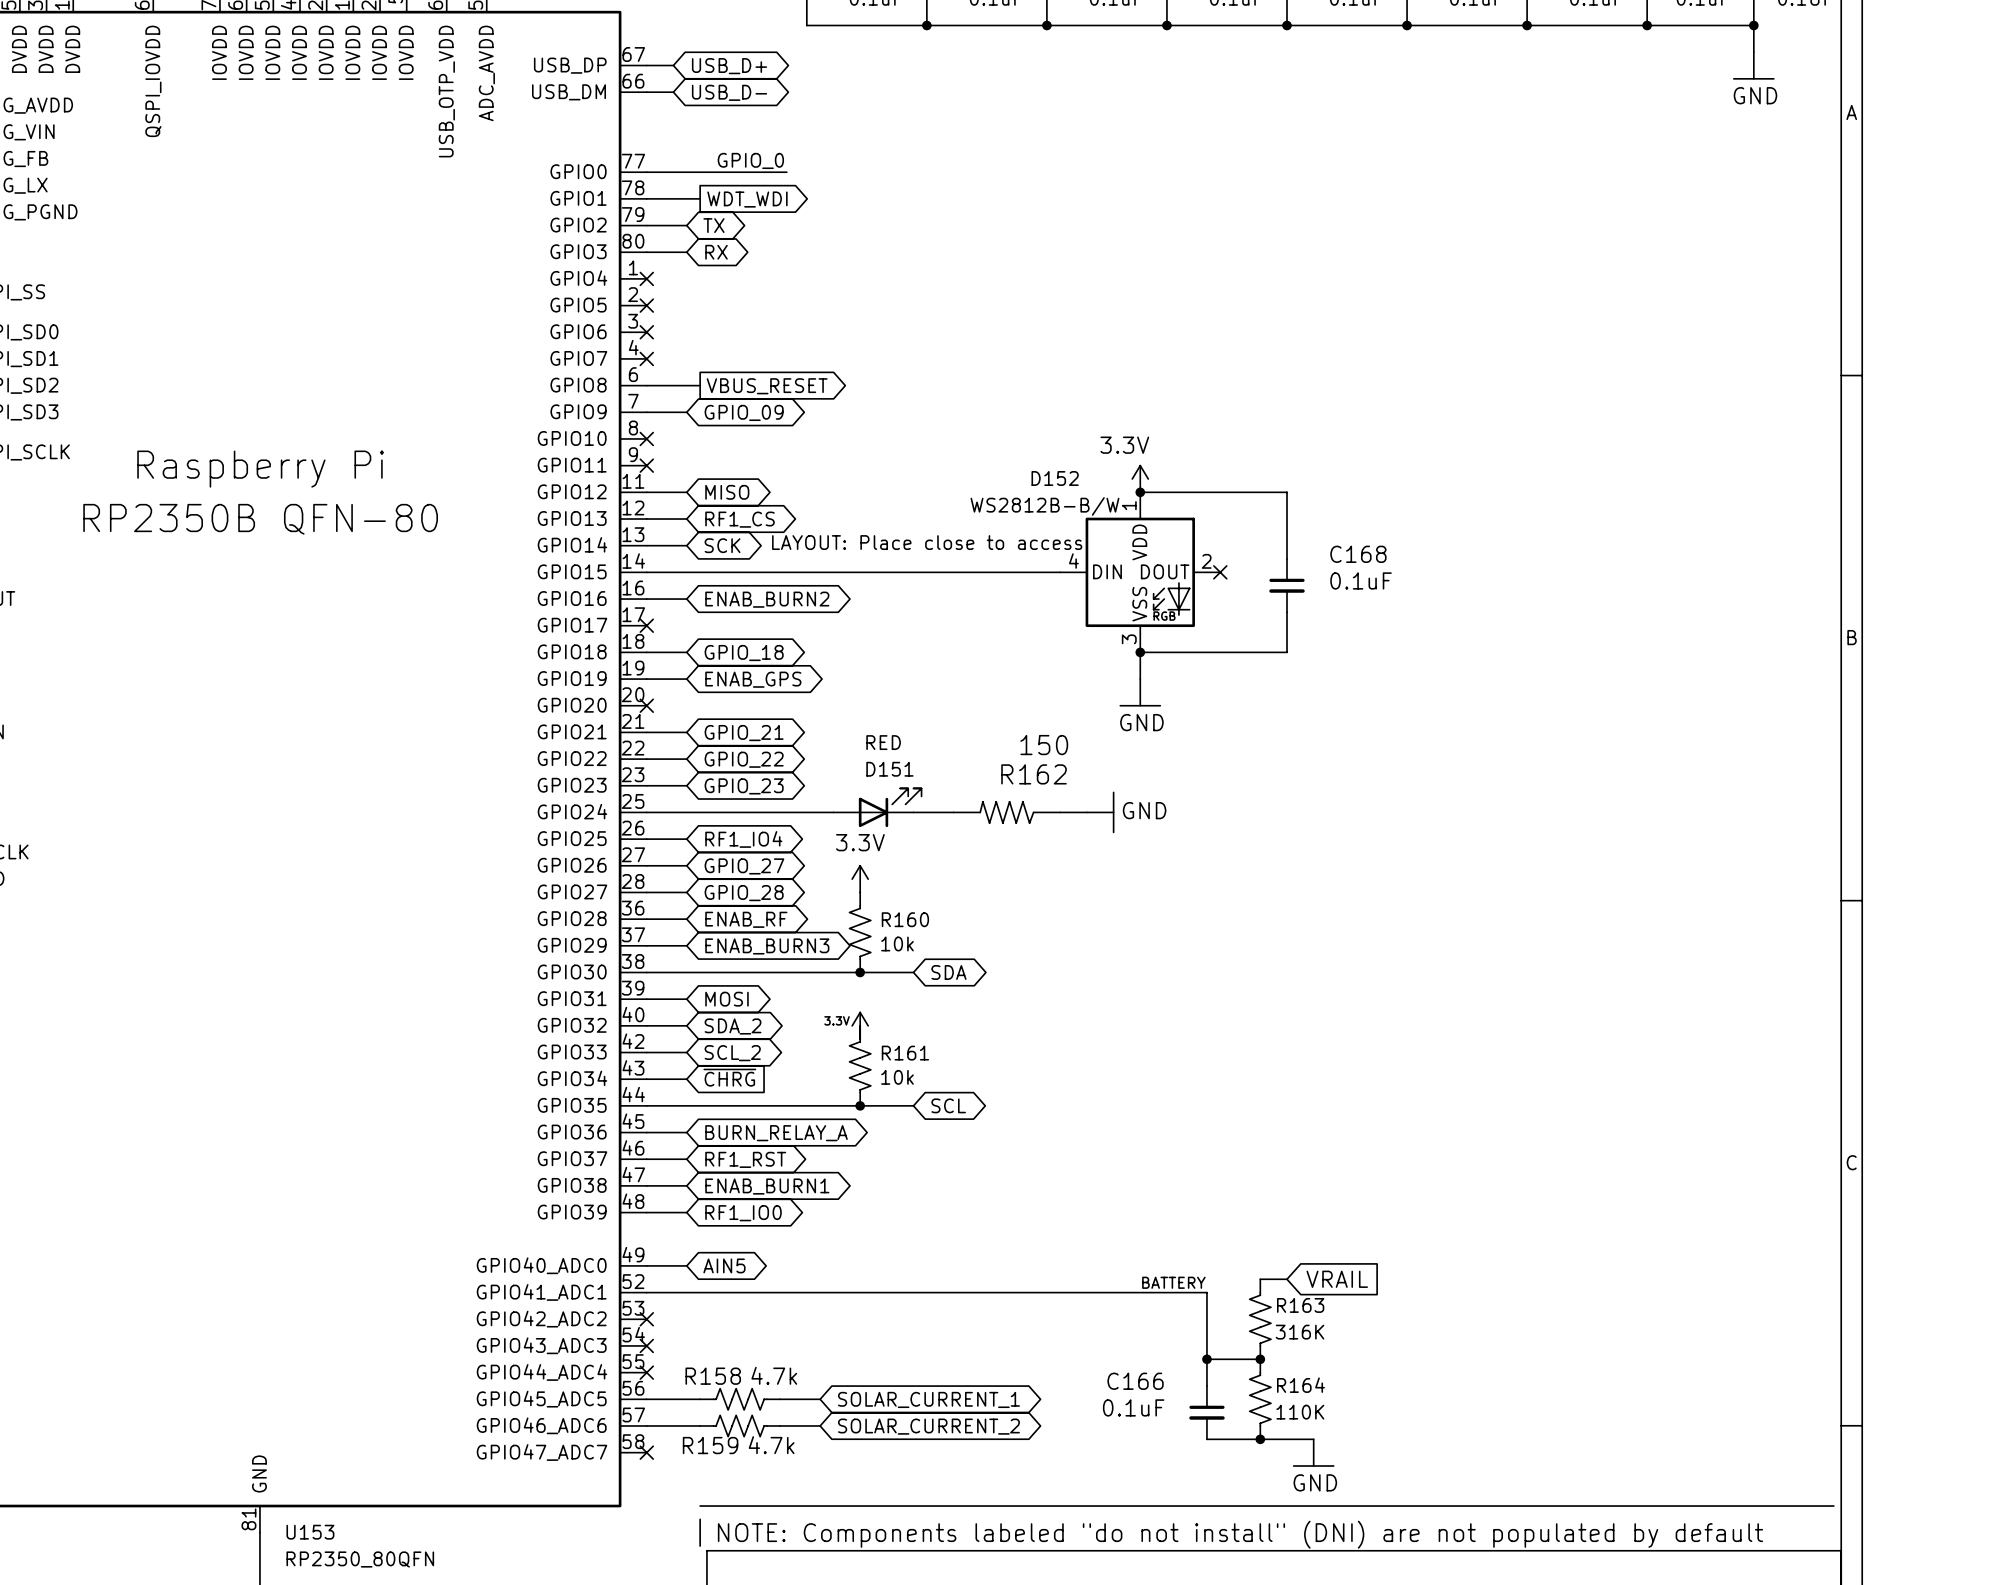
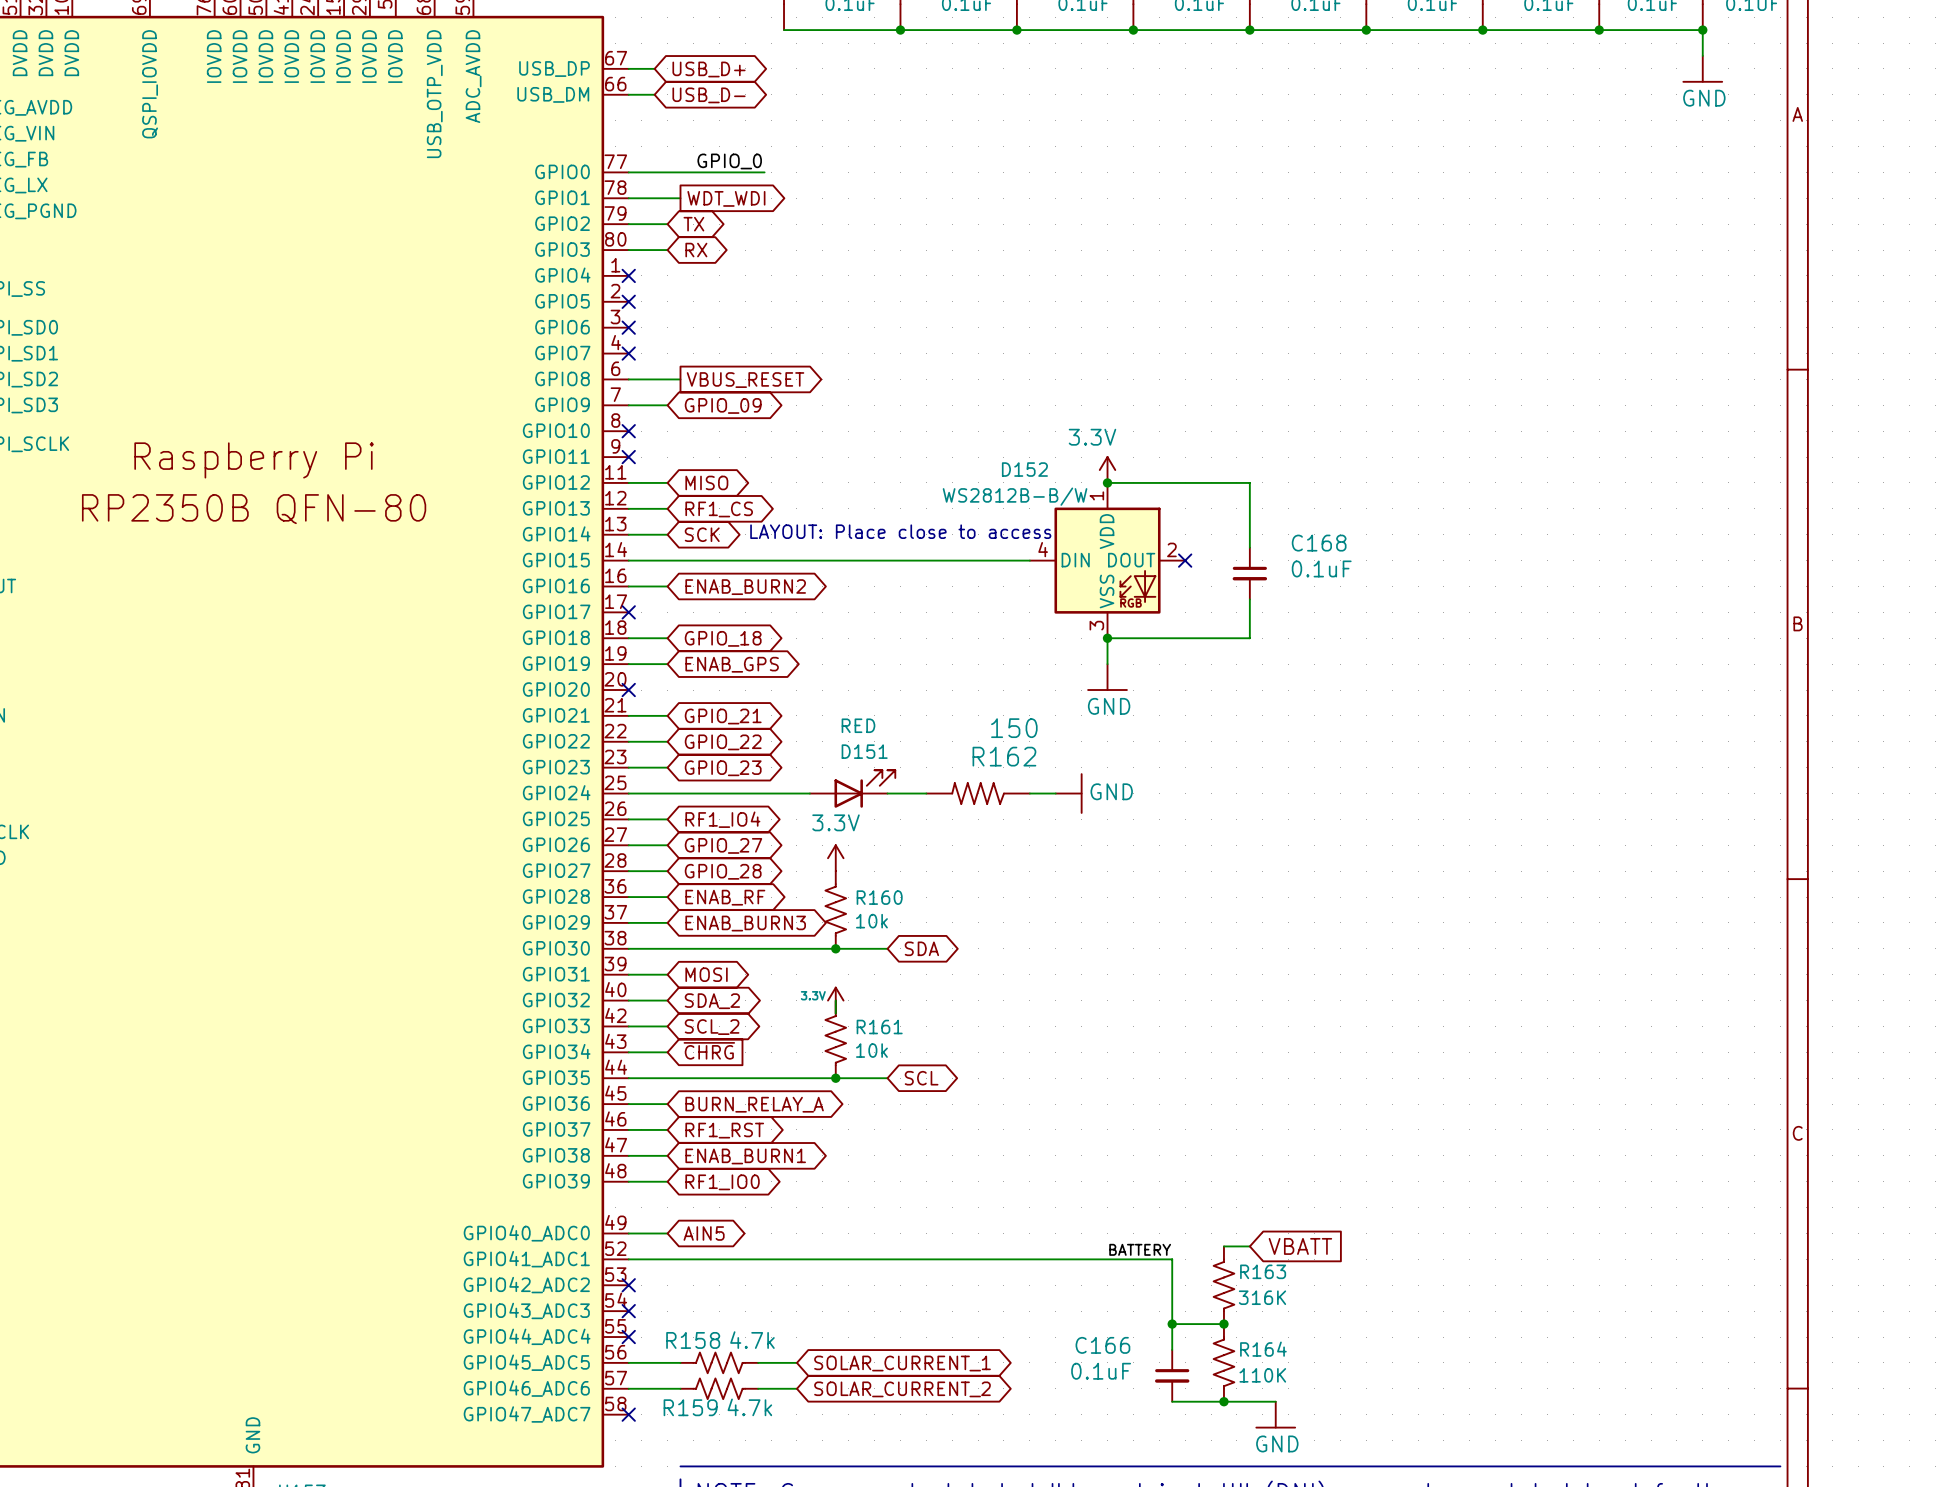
global label: VRAIL (1337, 1279) -> VBATT (1300, 1246)

